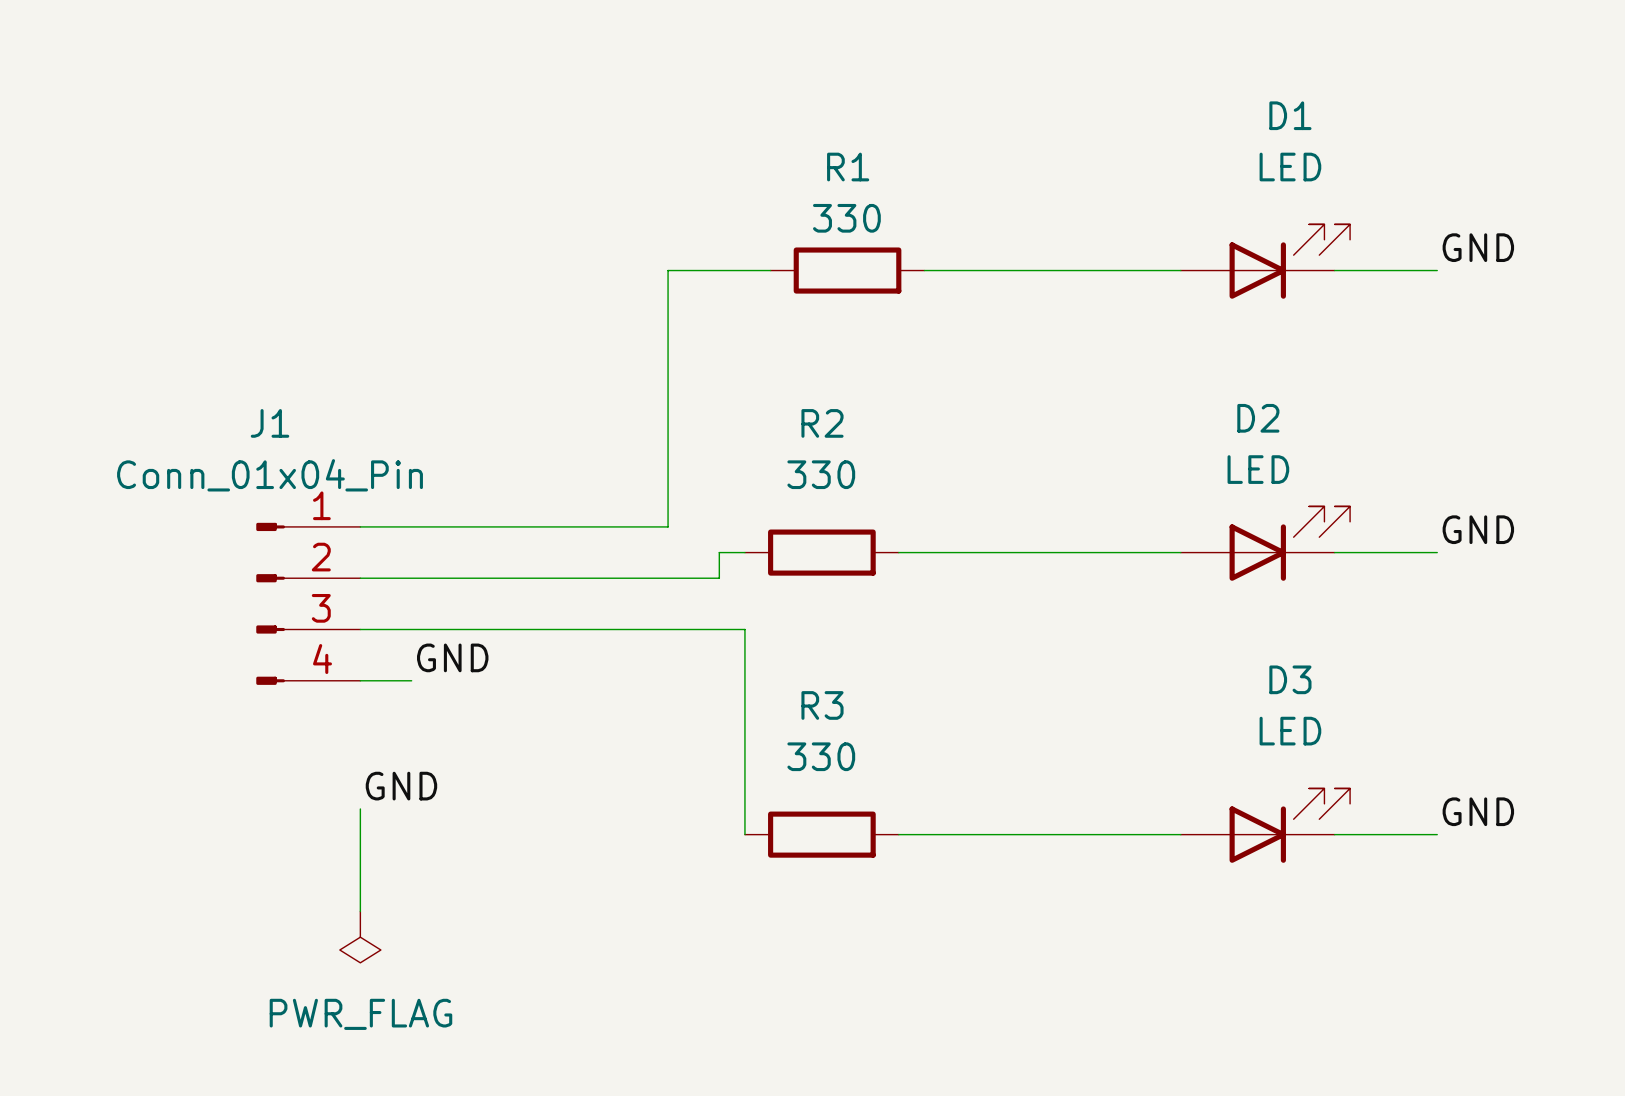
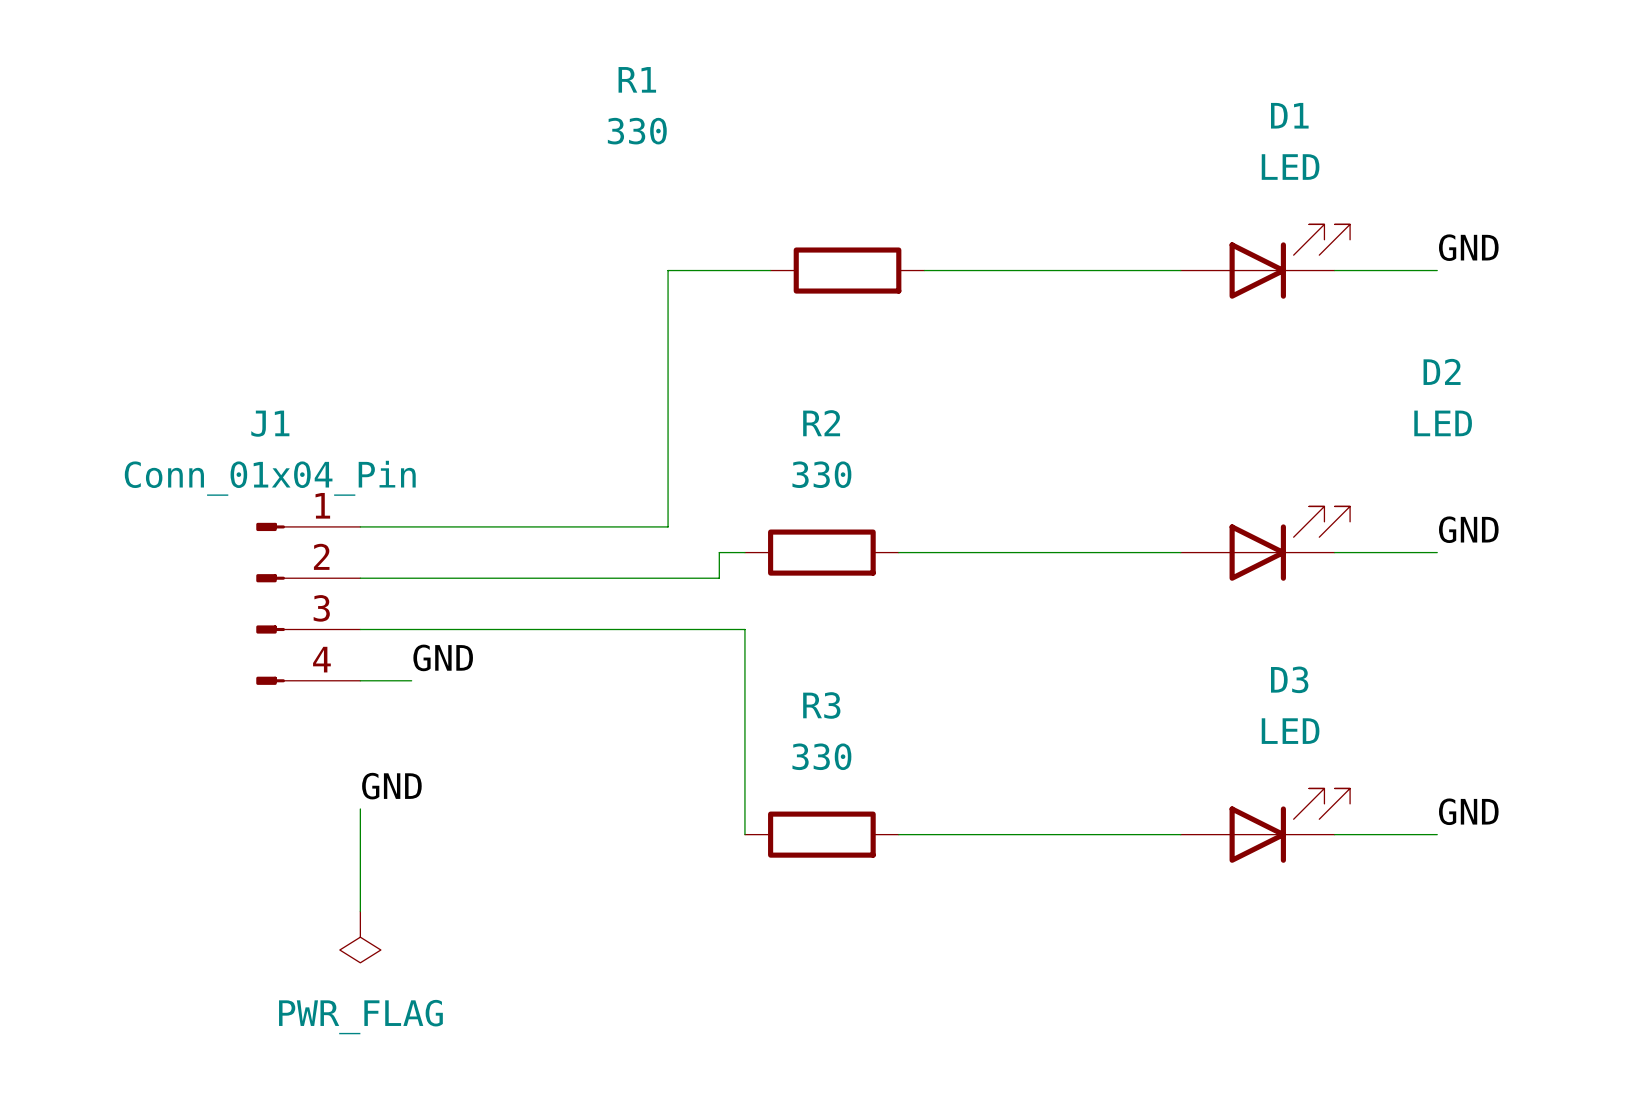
R1 name position: R1 (848, 167) -> R1 (637, 79)
R1 value position: 330 (846, 218) -> 330 (637, 131)
D2 name position: D2 (1258, 418) -> D2 (1442, 371)
D2 value position: LED (1258, 469) -> LED (1443, 423)

